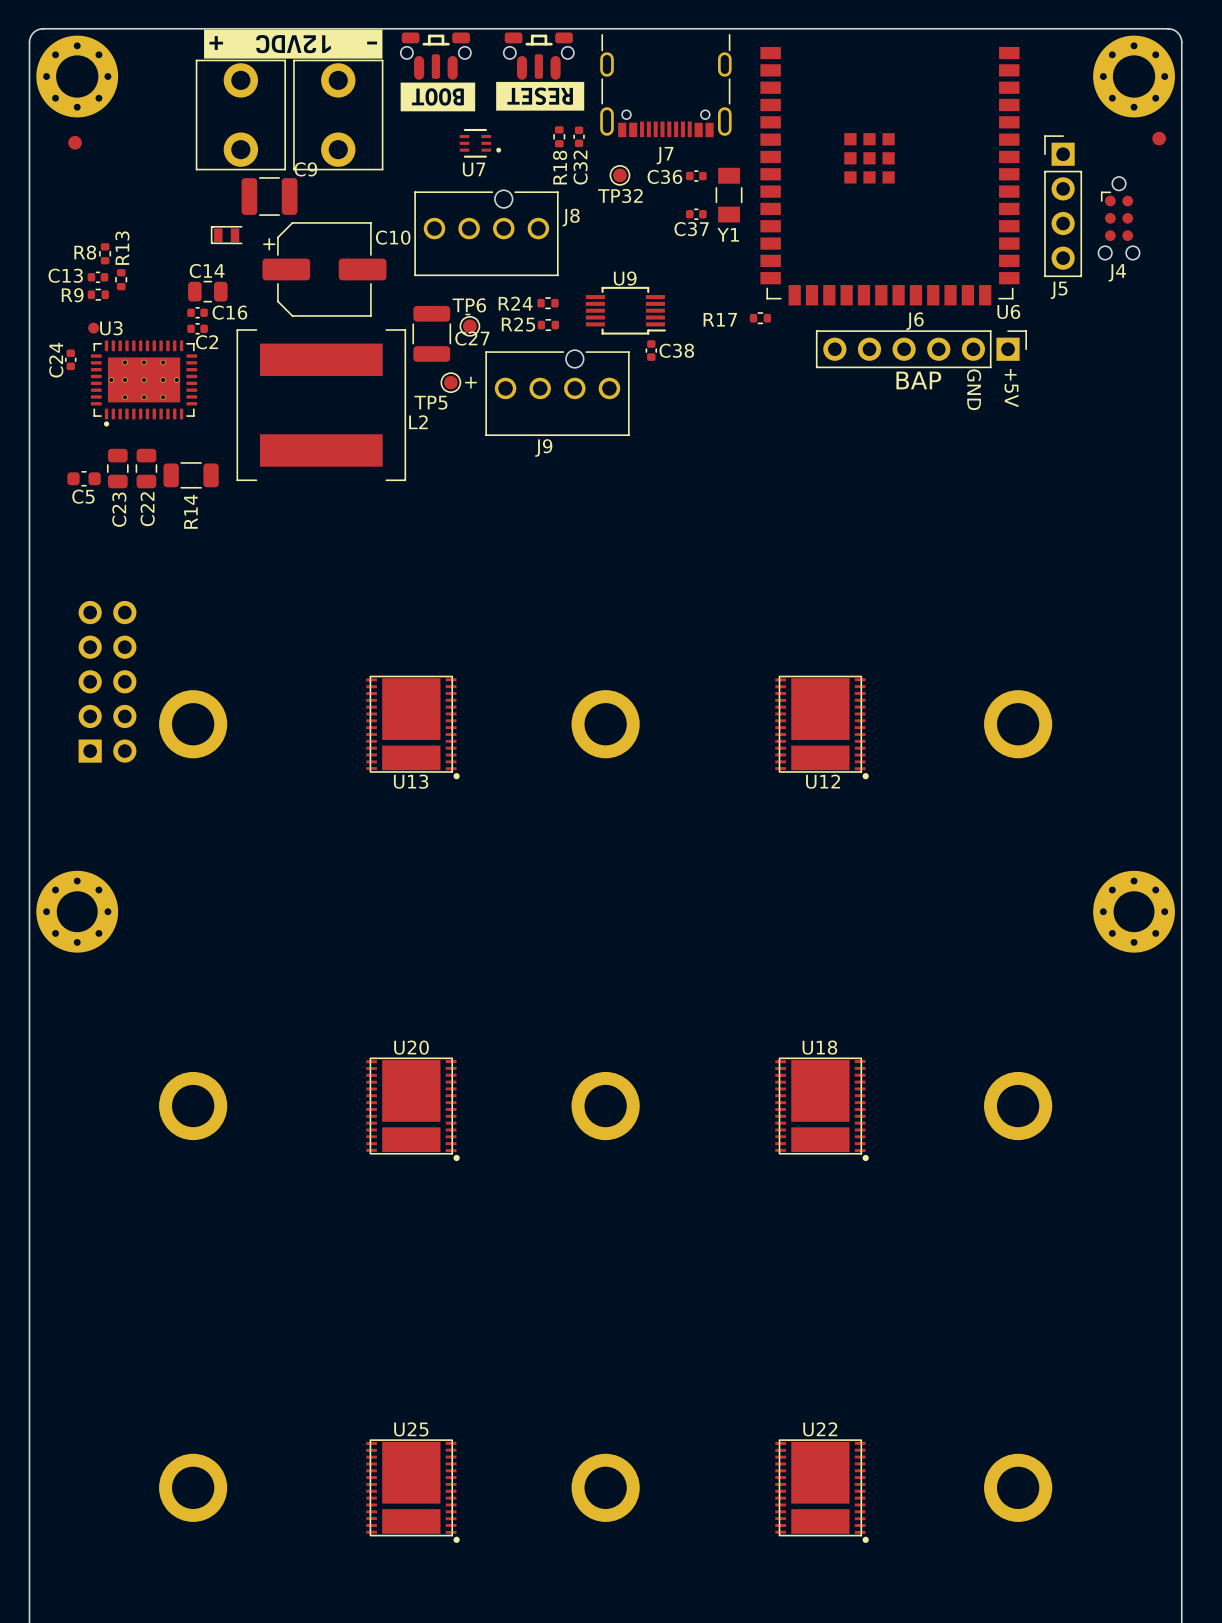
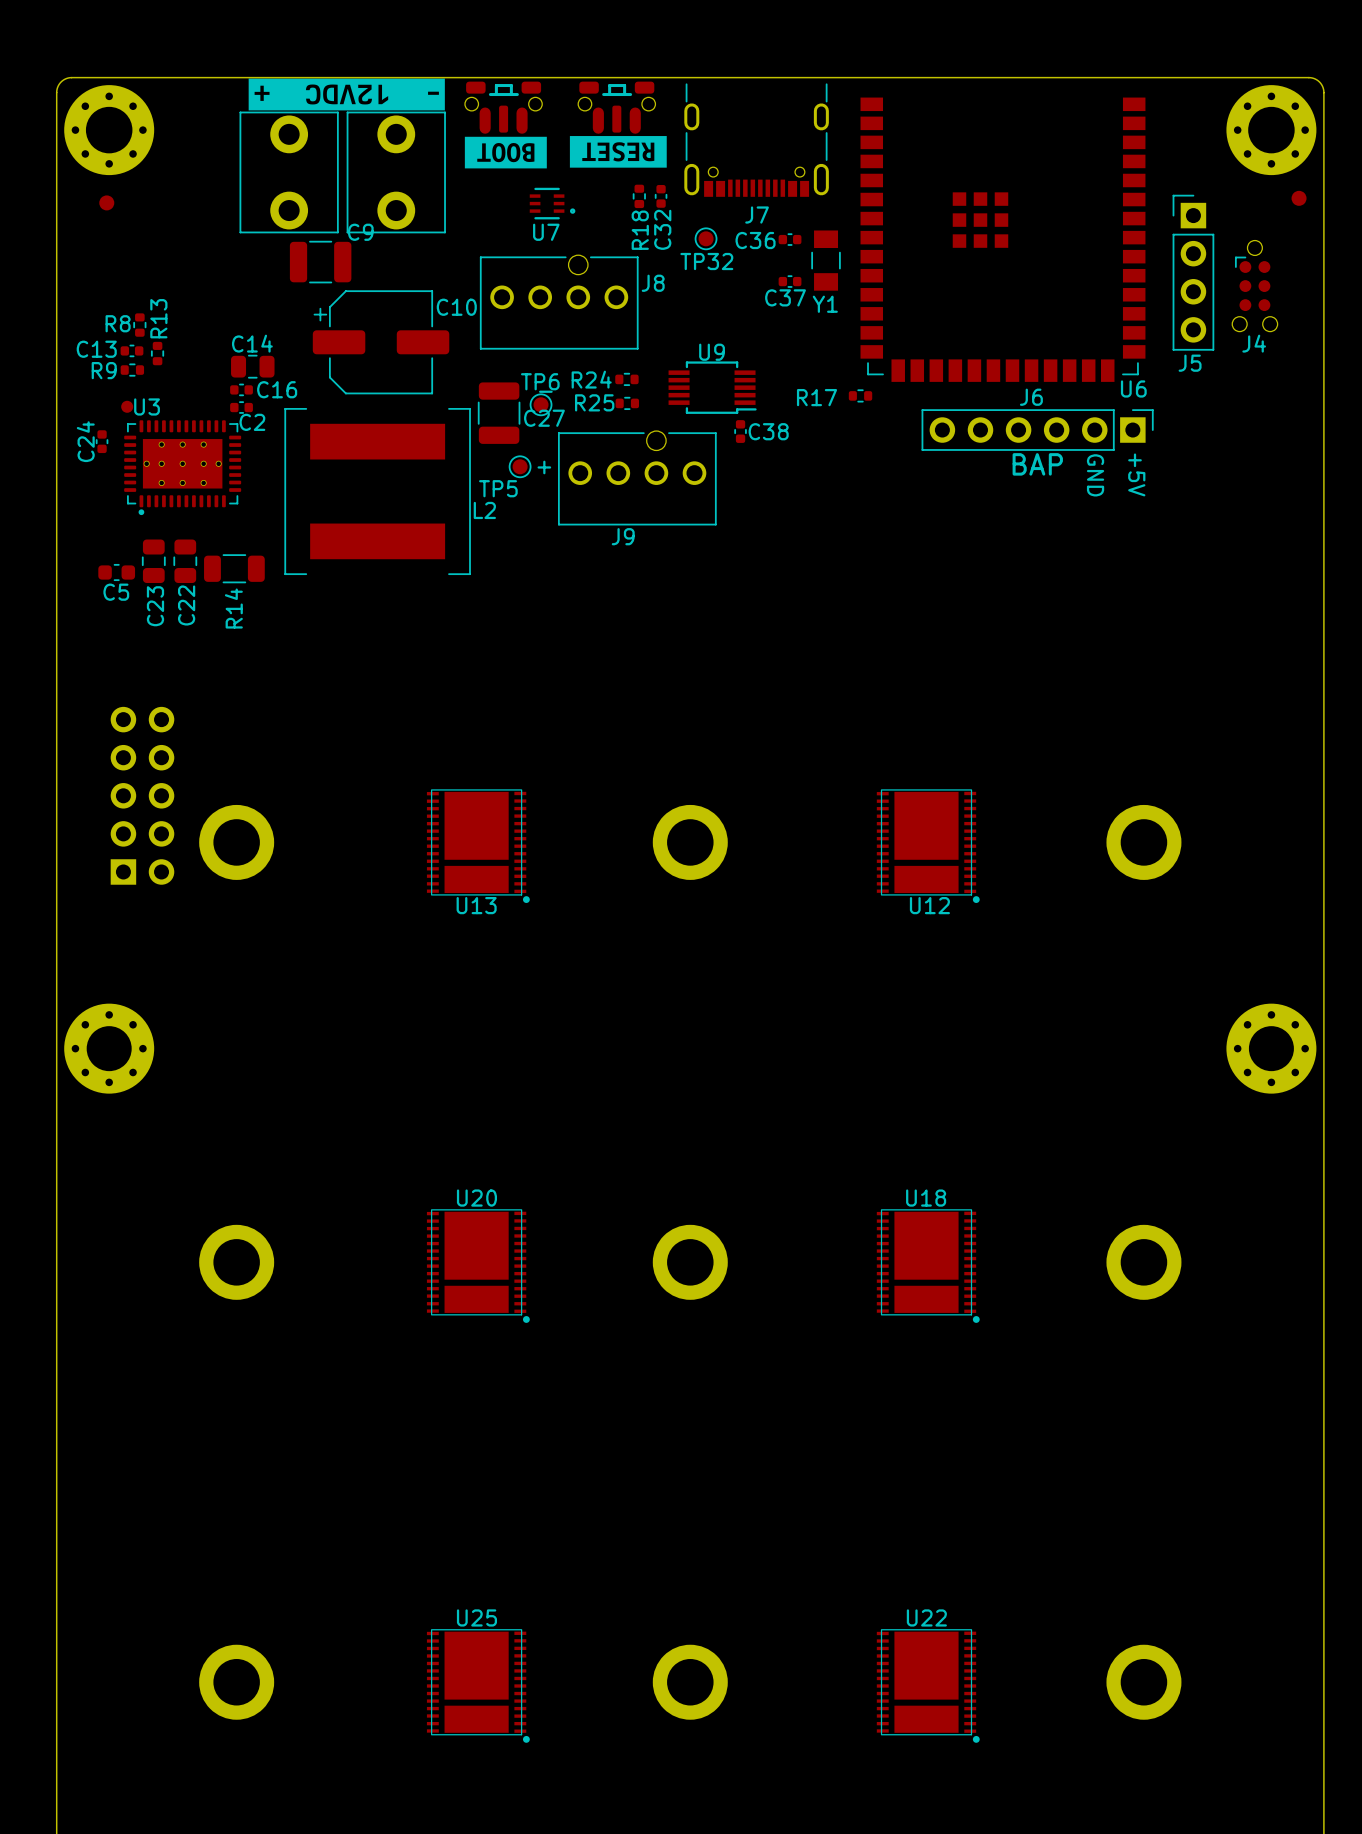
part: (226, 235) -> none

